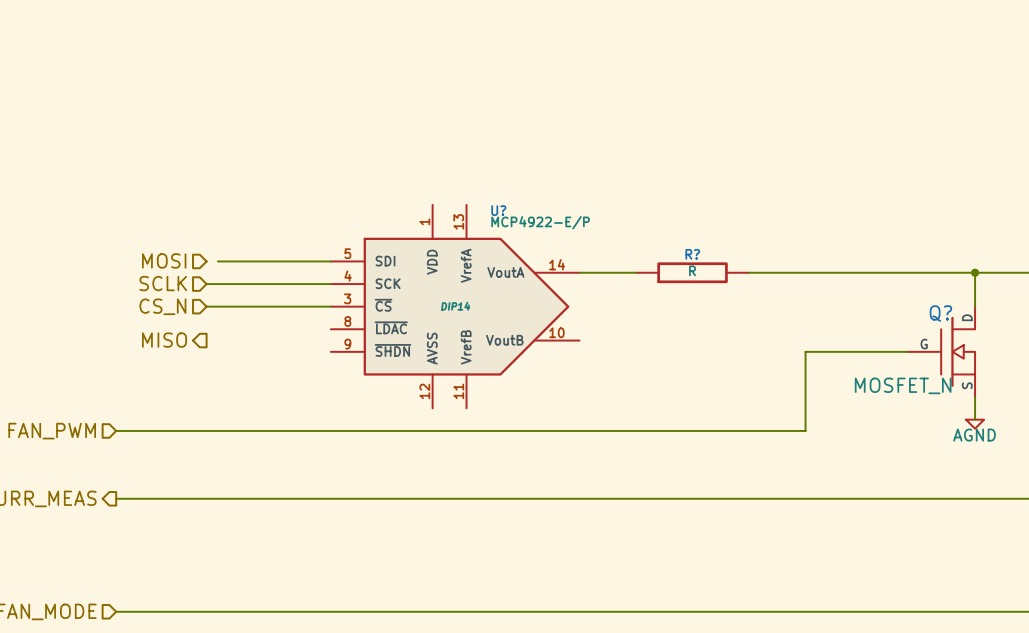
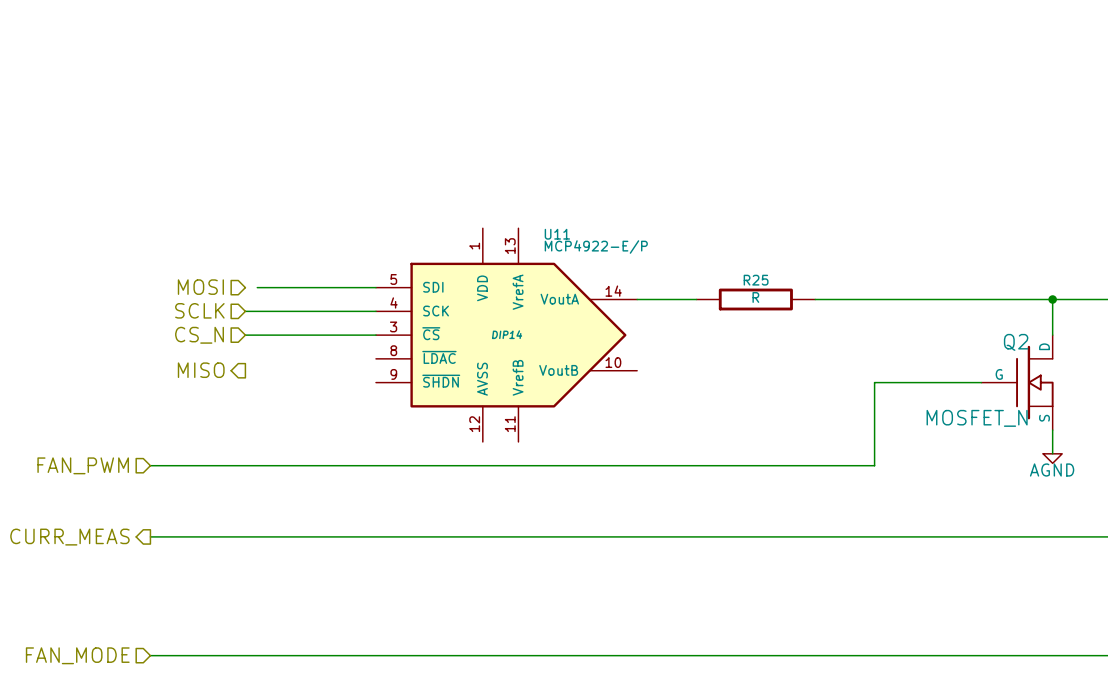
U? name: U? (498, 210) -> U11 (557, 234)
R? name: R? (692, 254) -> R25 (756, 280)
Q? name: Q? (940, 313) -> Q2 (1016, 342)

